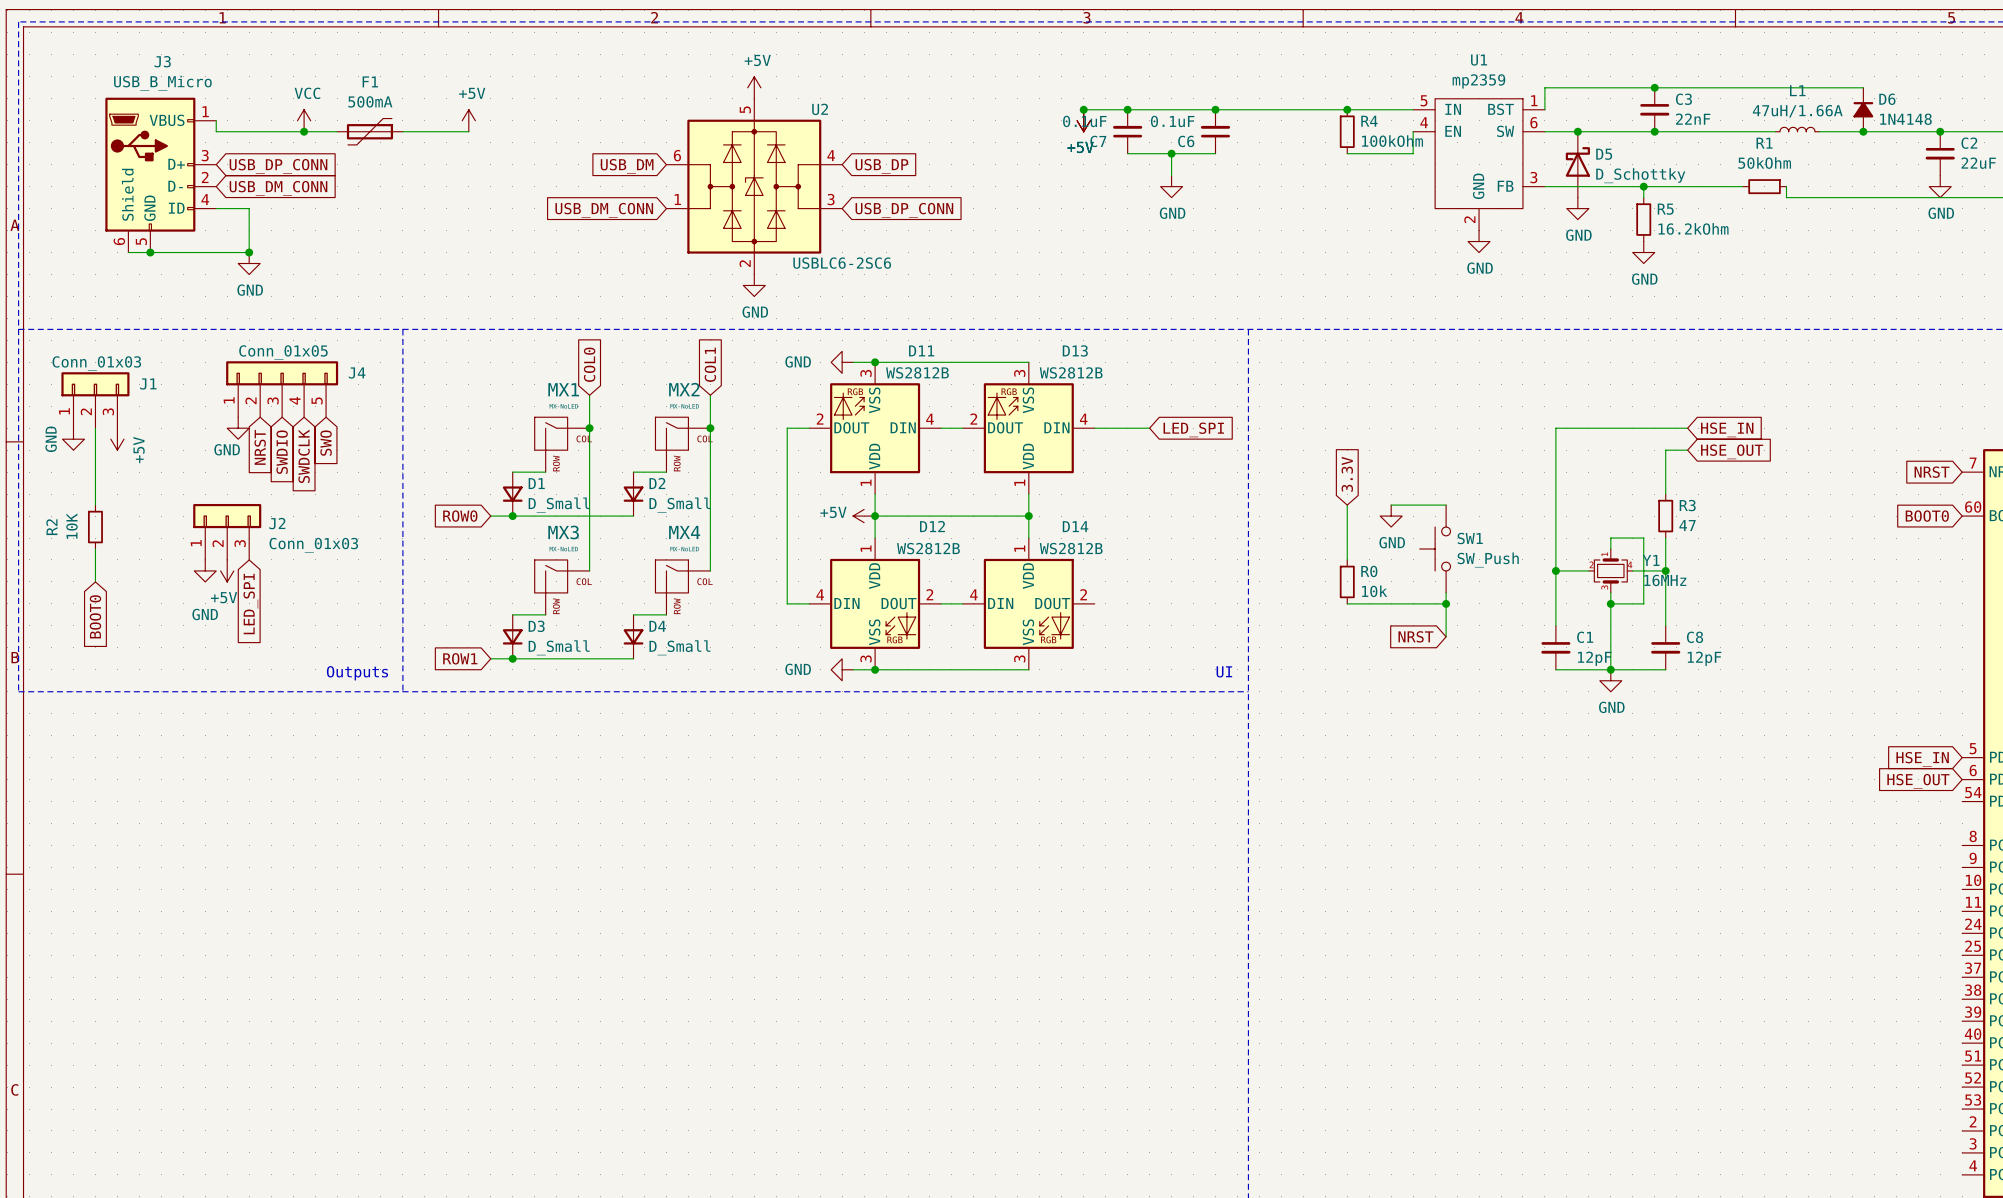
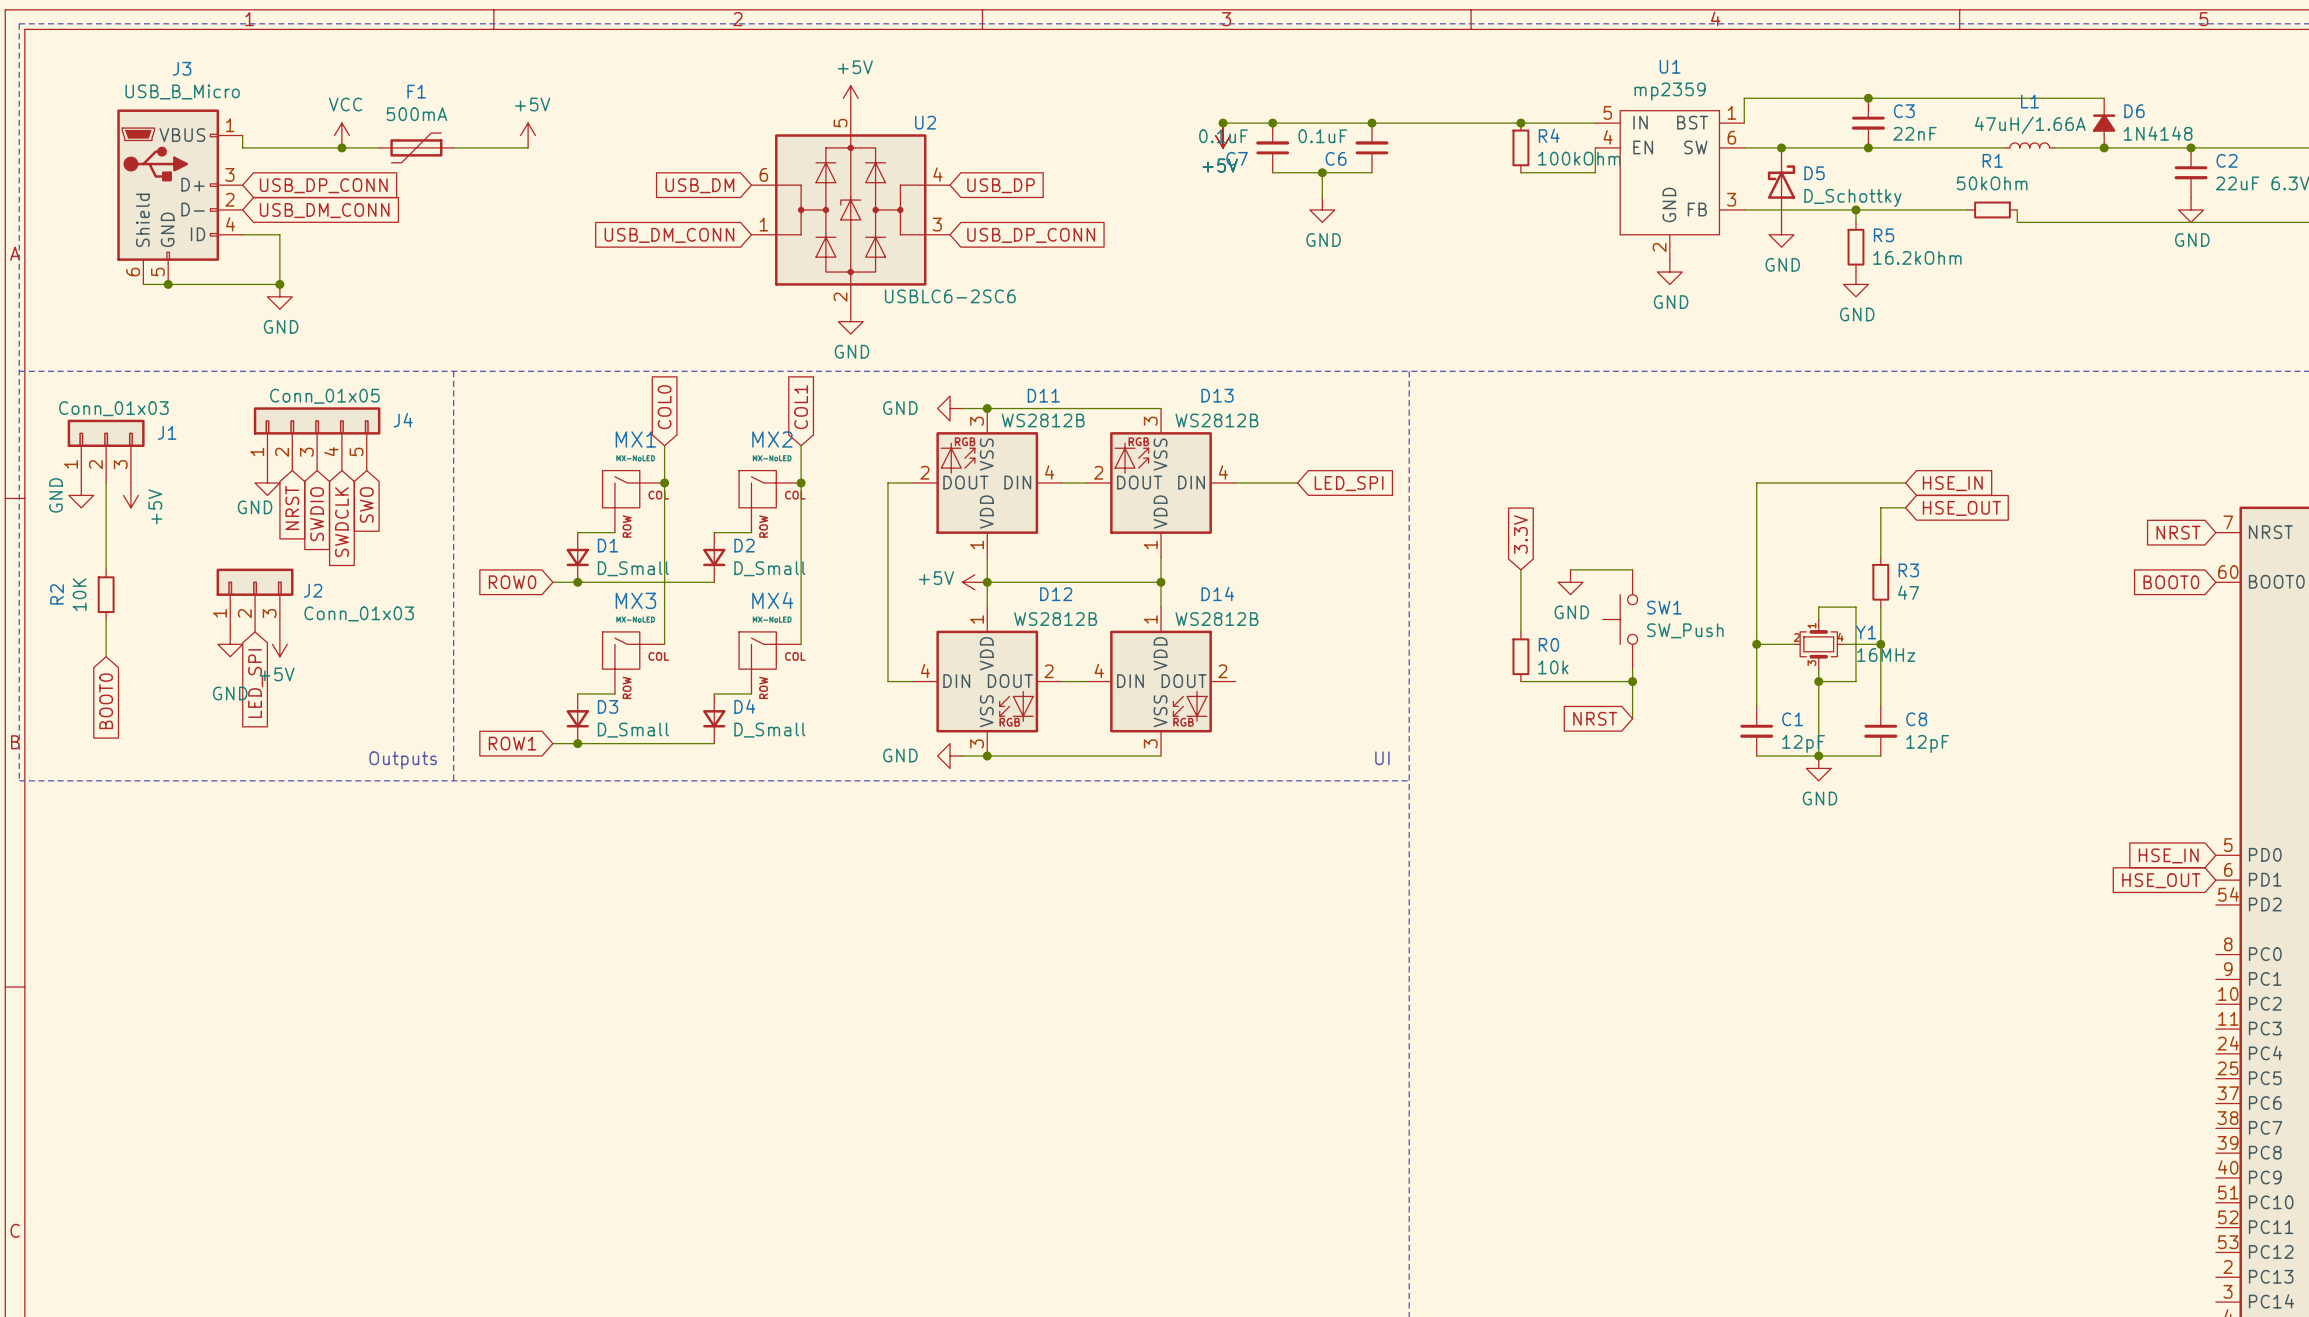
power symbol position: +5V (227, 570) -> +5V (279, 644)
global label position: LED_SPI (250, 604) -> LED_SPI (255, 683)

